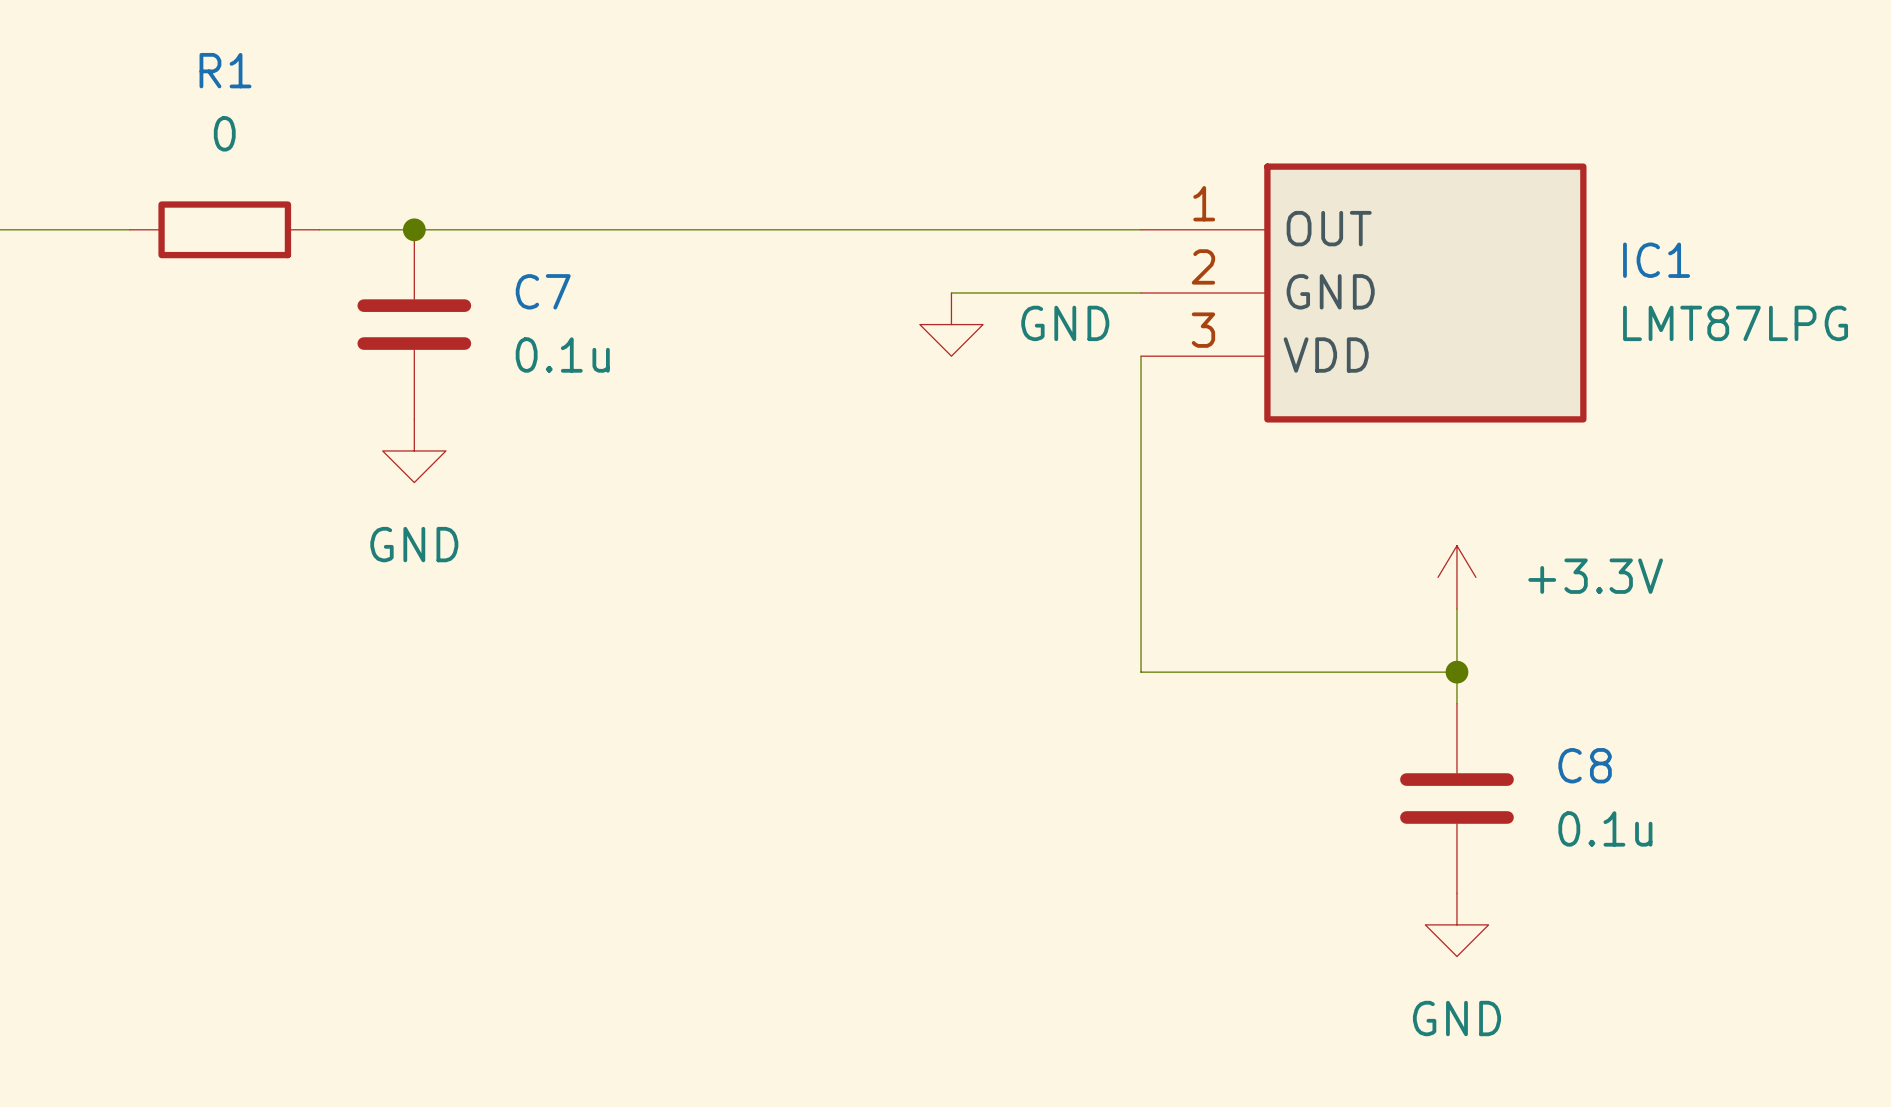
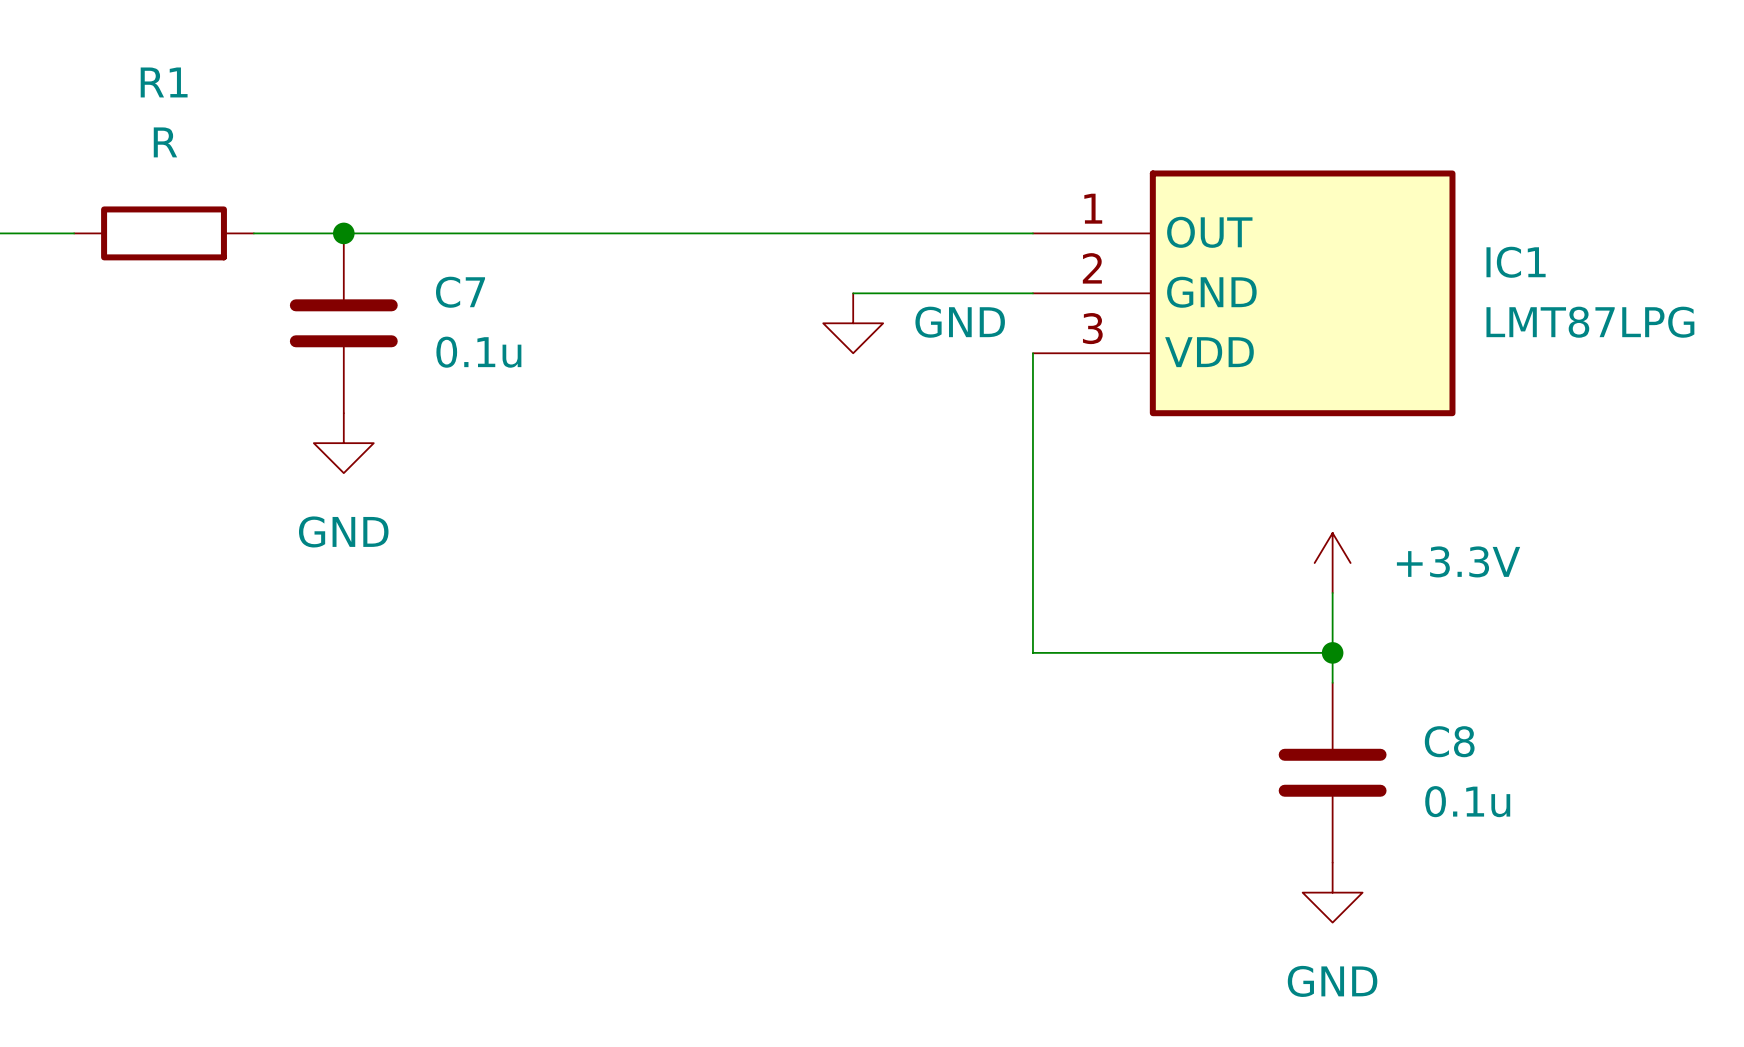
R1 value: 0 (224, 133) -> R (165, 142)

